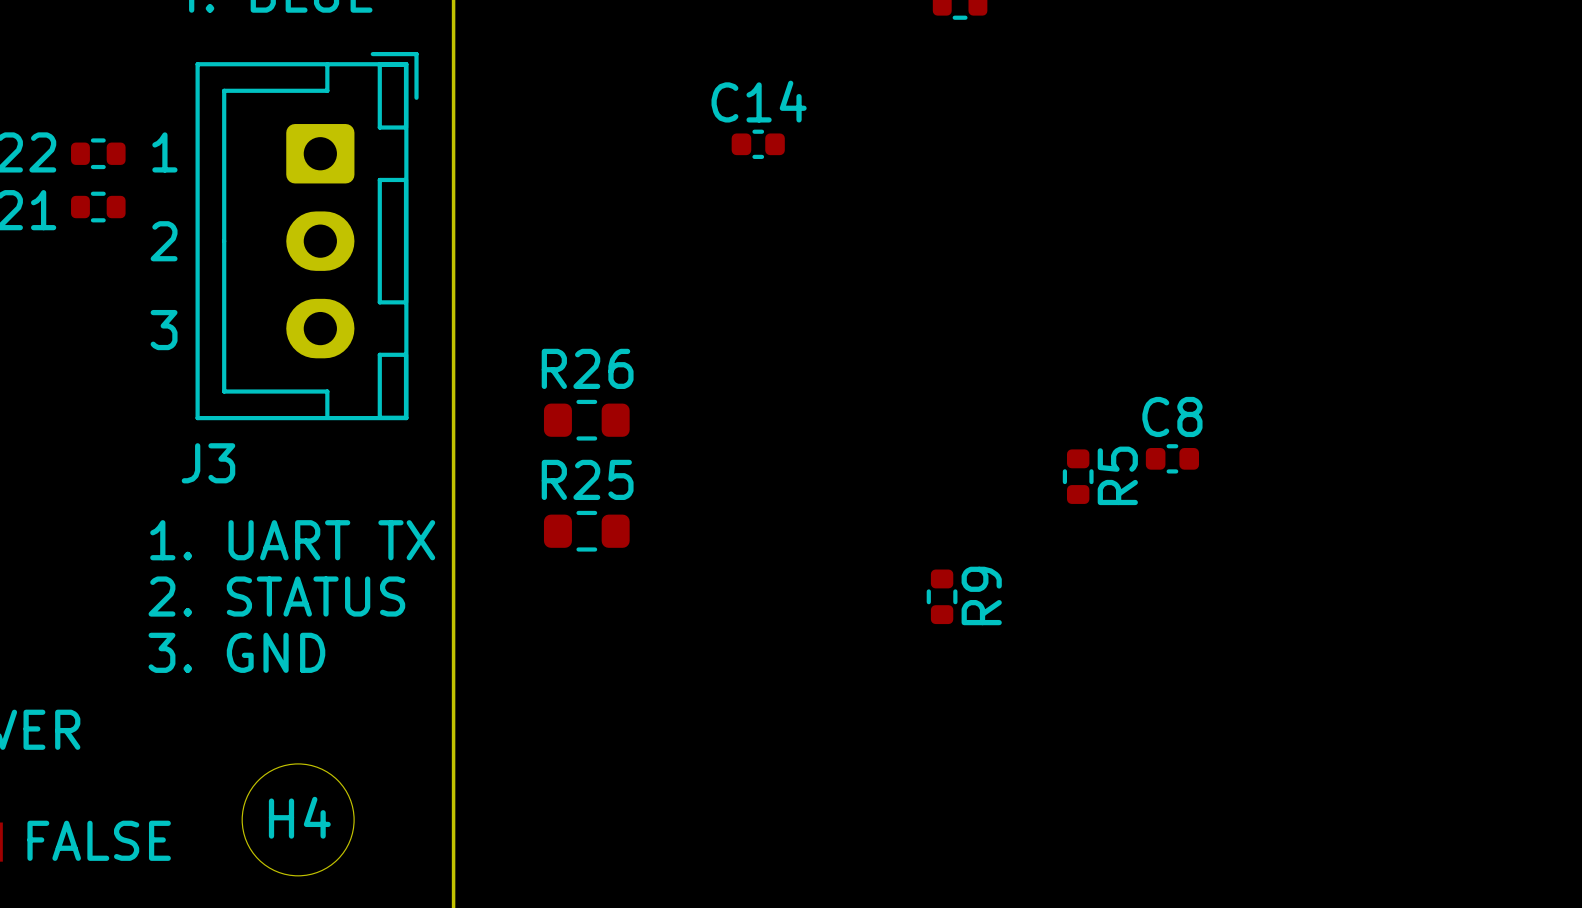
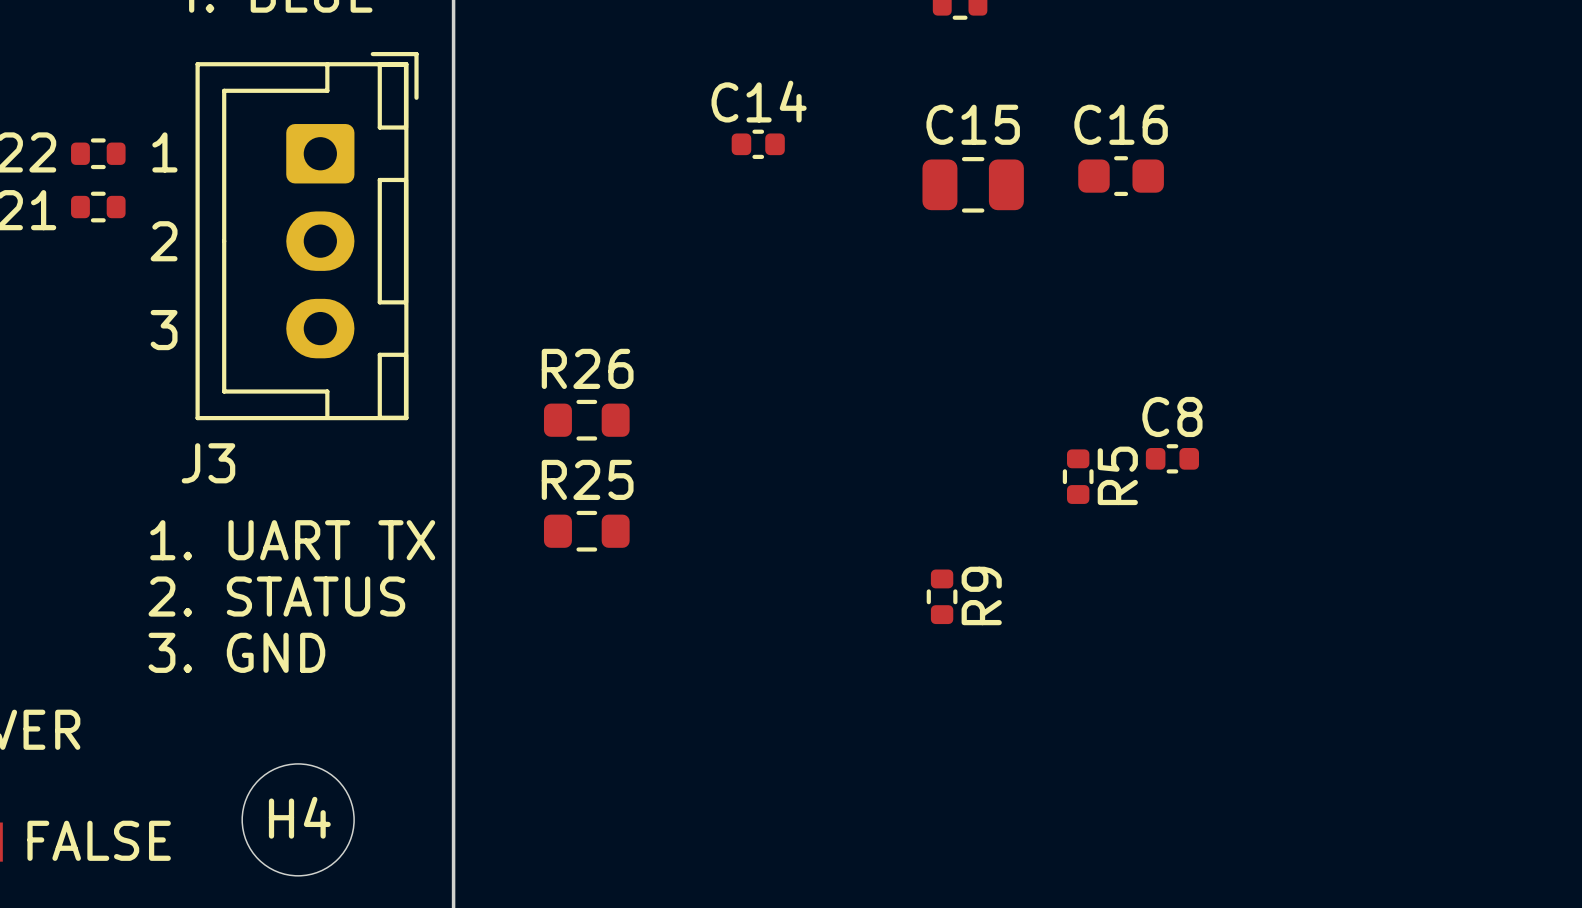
C16: none -> (1121, 176)
C15: none -> (973, 184)

